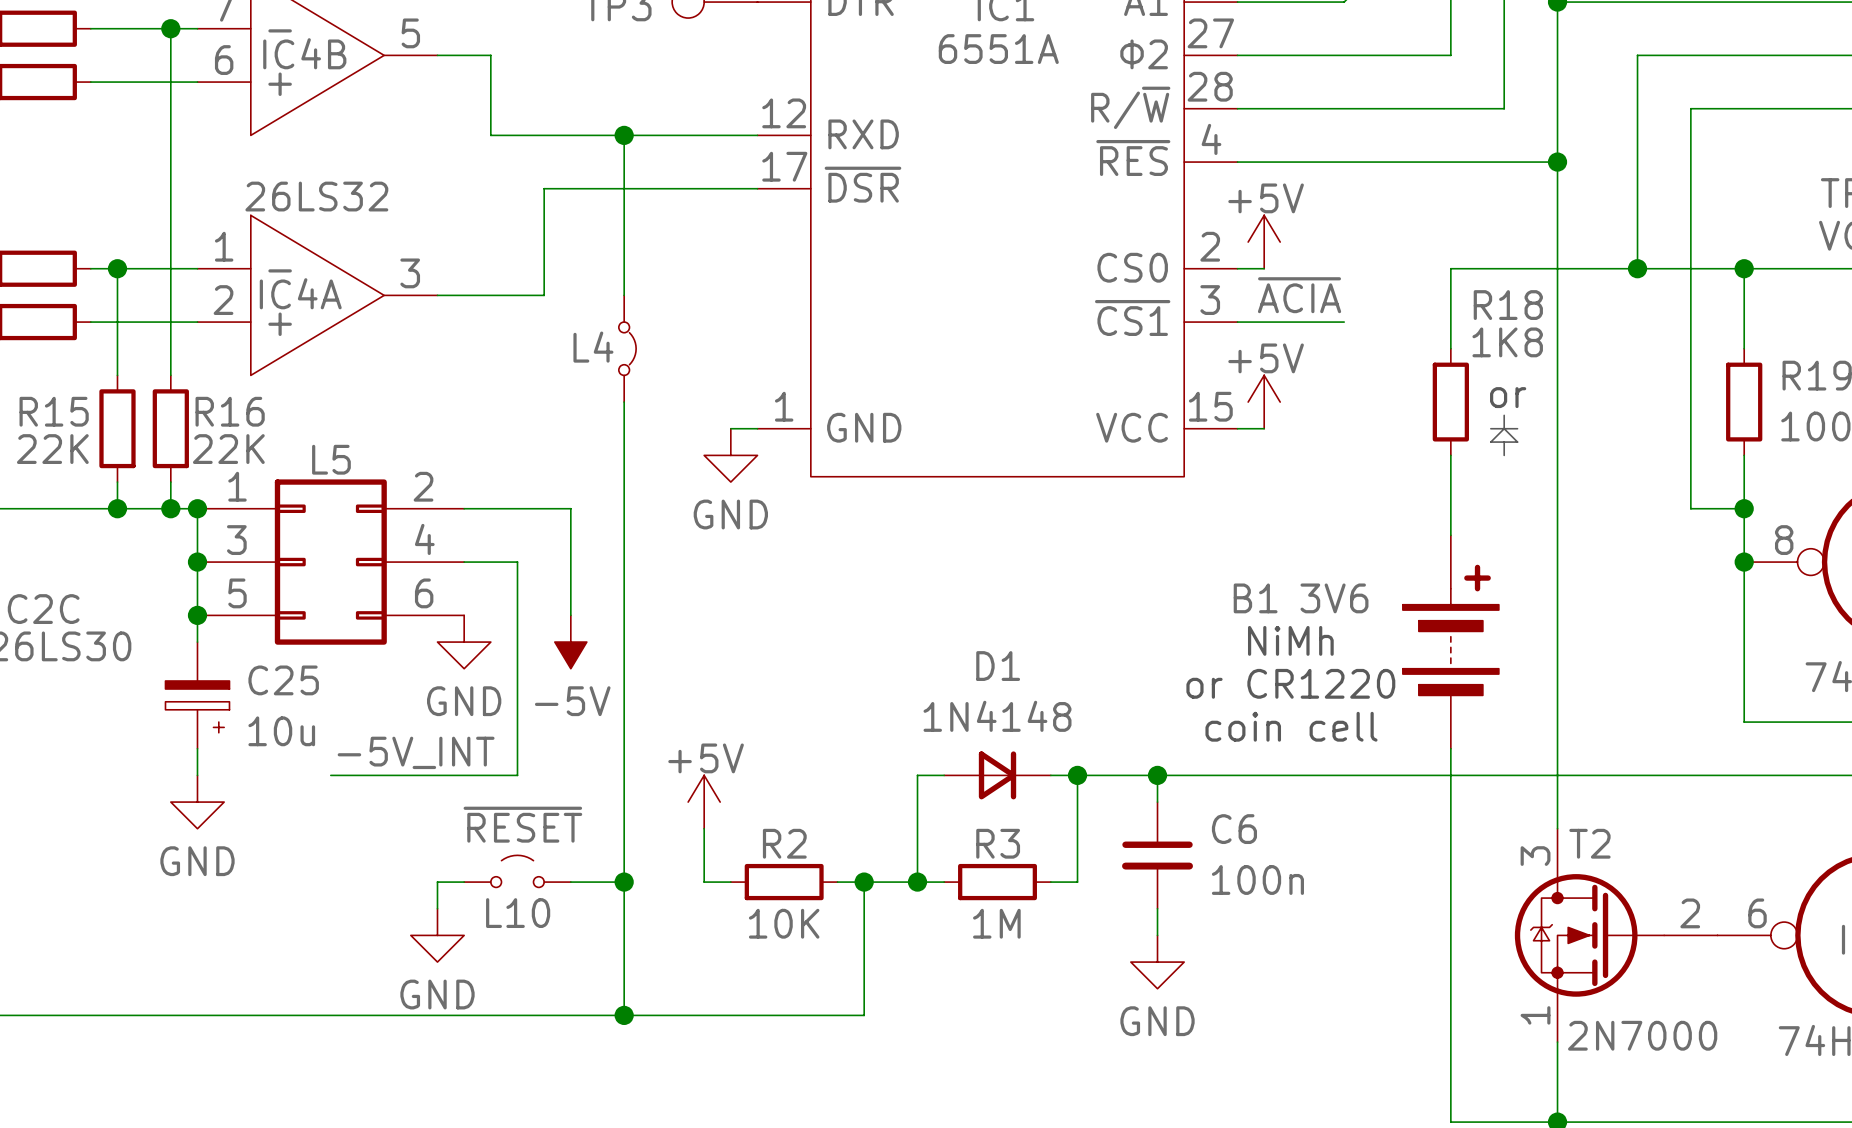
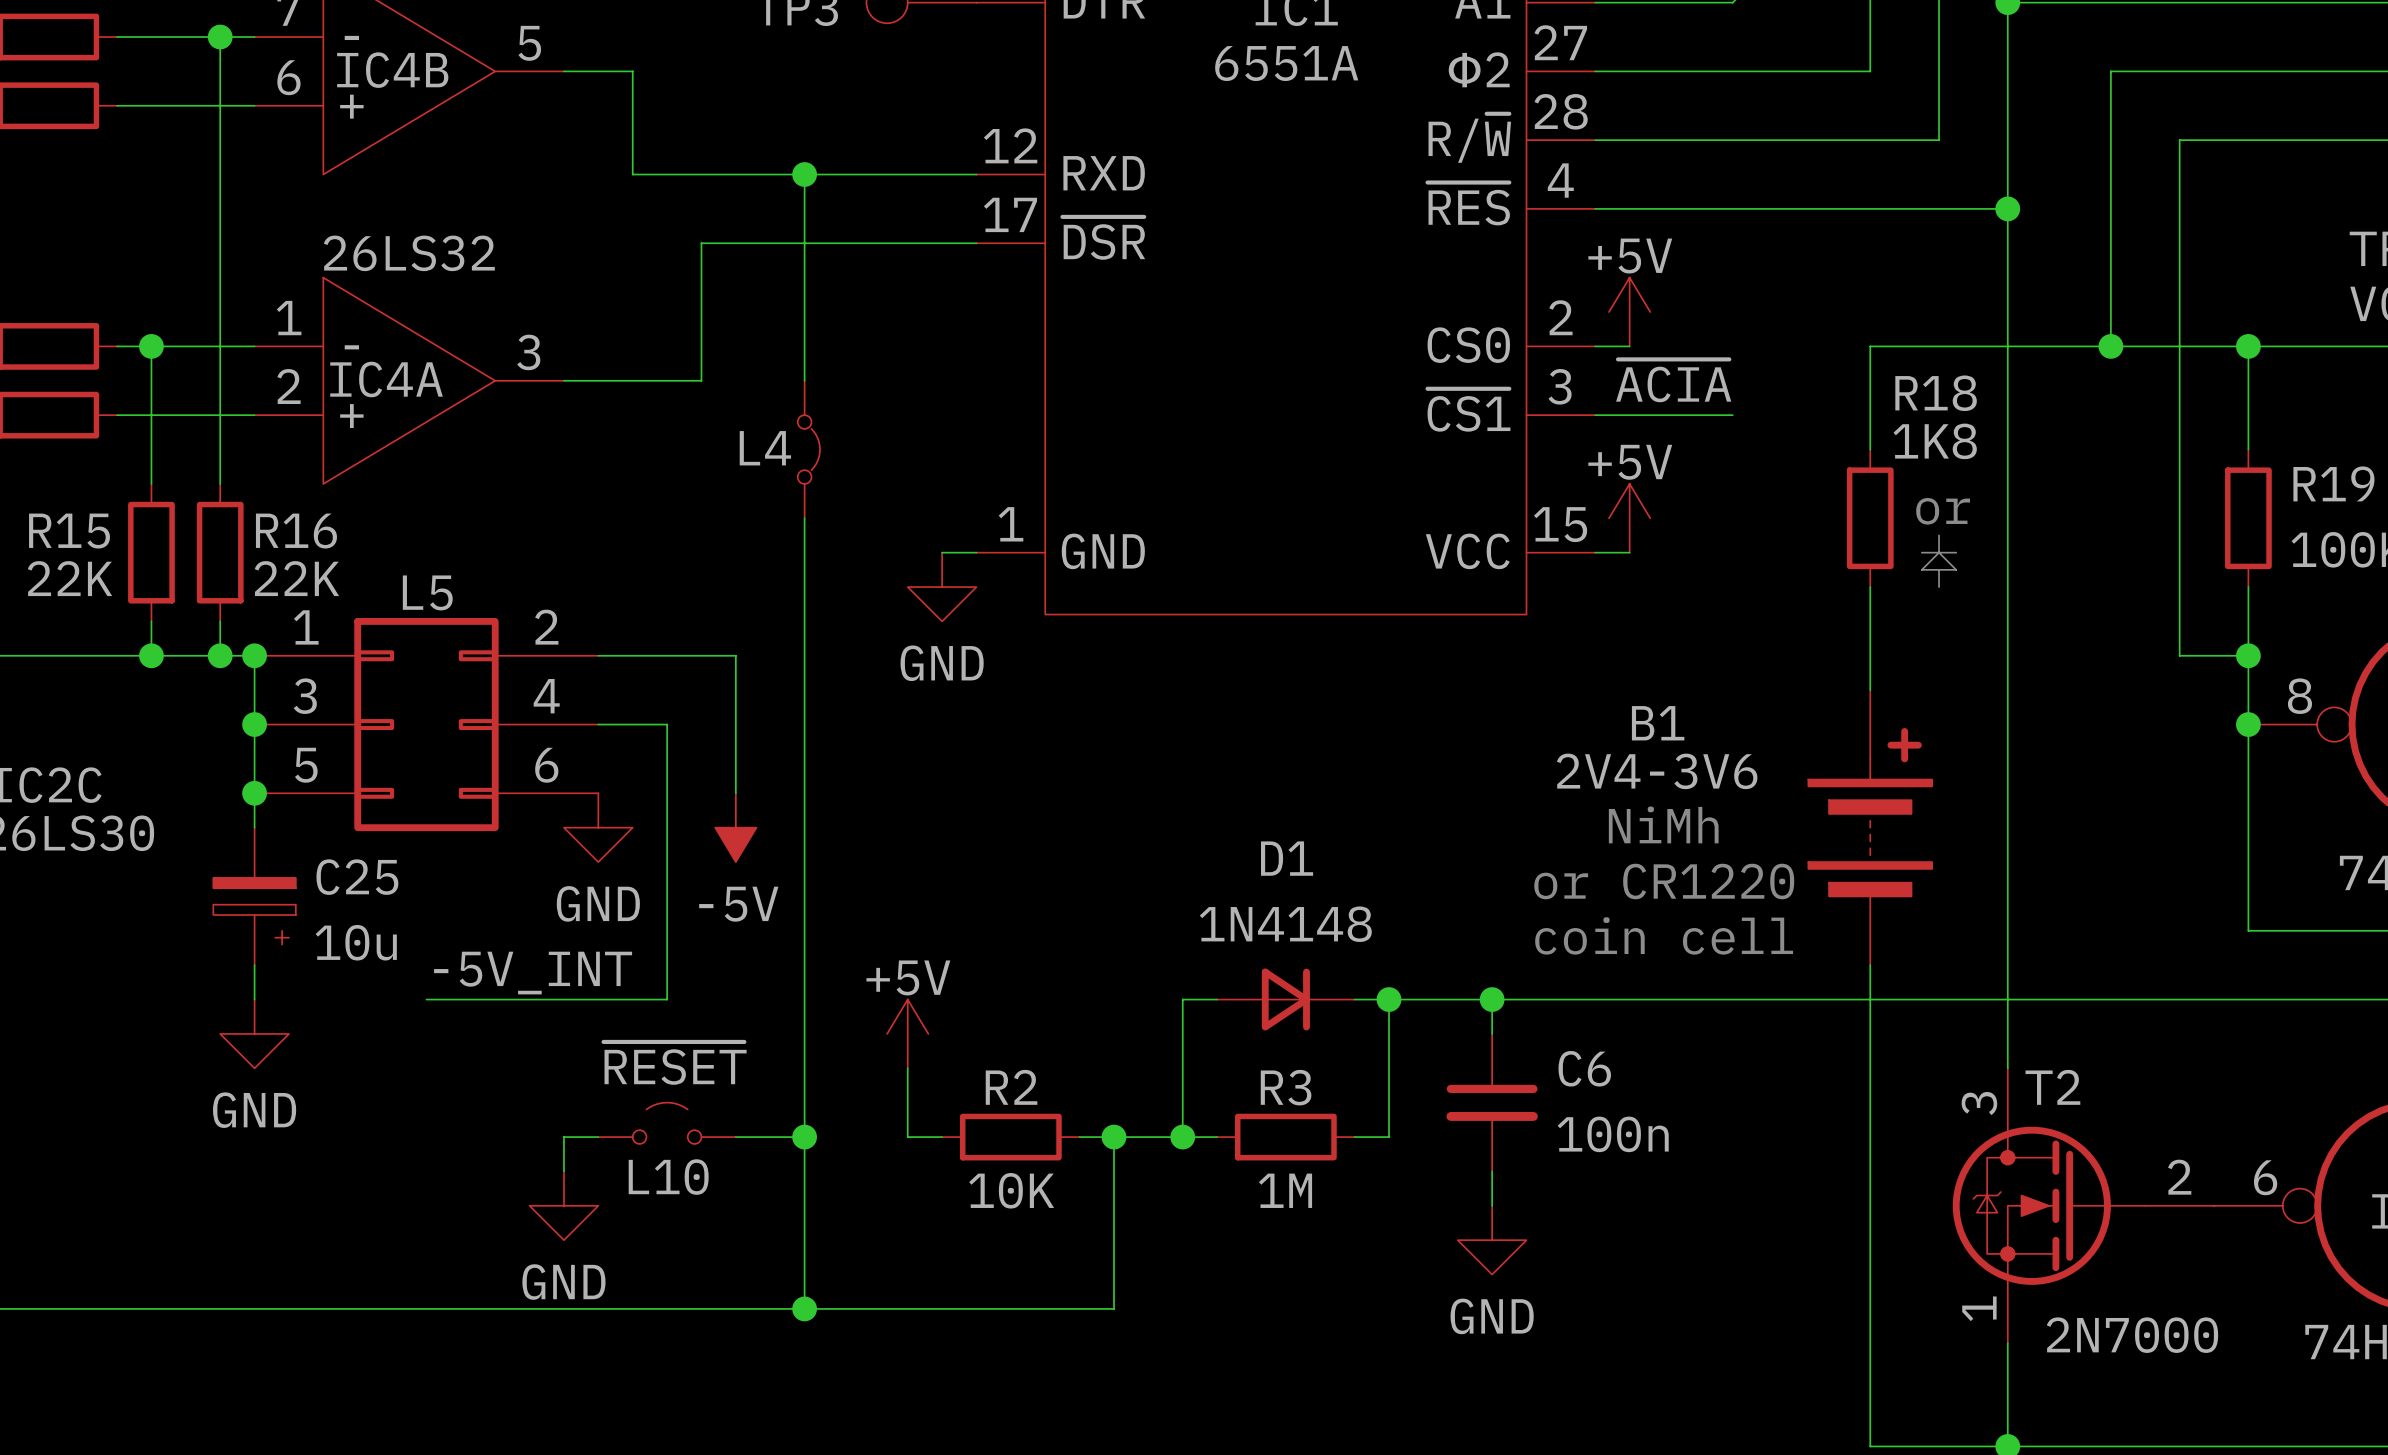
B1 name position: B1 (1255, 598) -> B1 (1658, 723)
B1 value: 3V6 (1334, 598) -> 2V4-3V6 (1657, 771)

